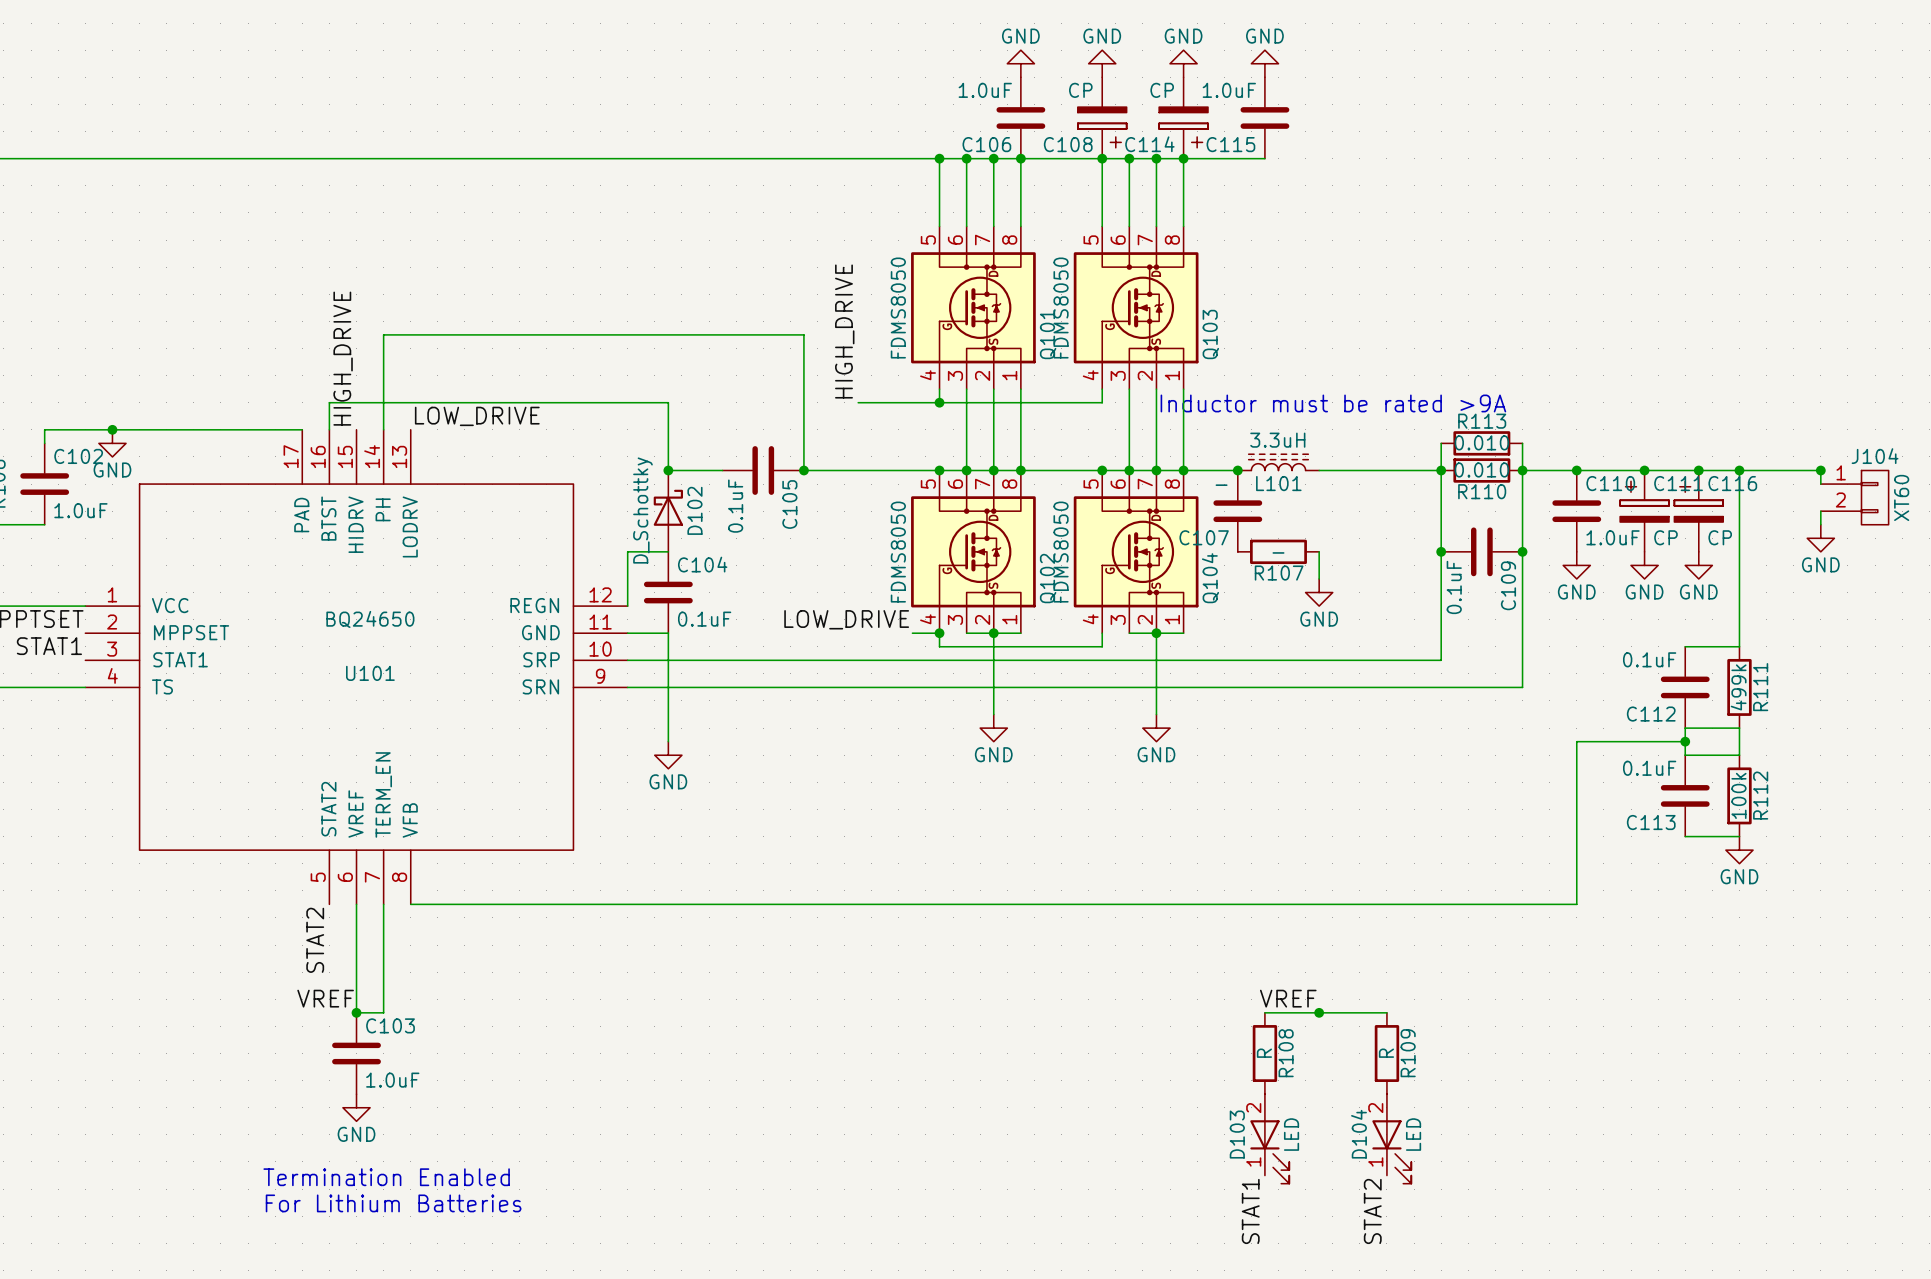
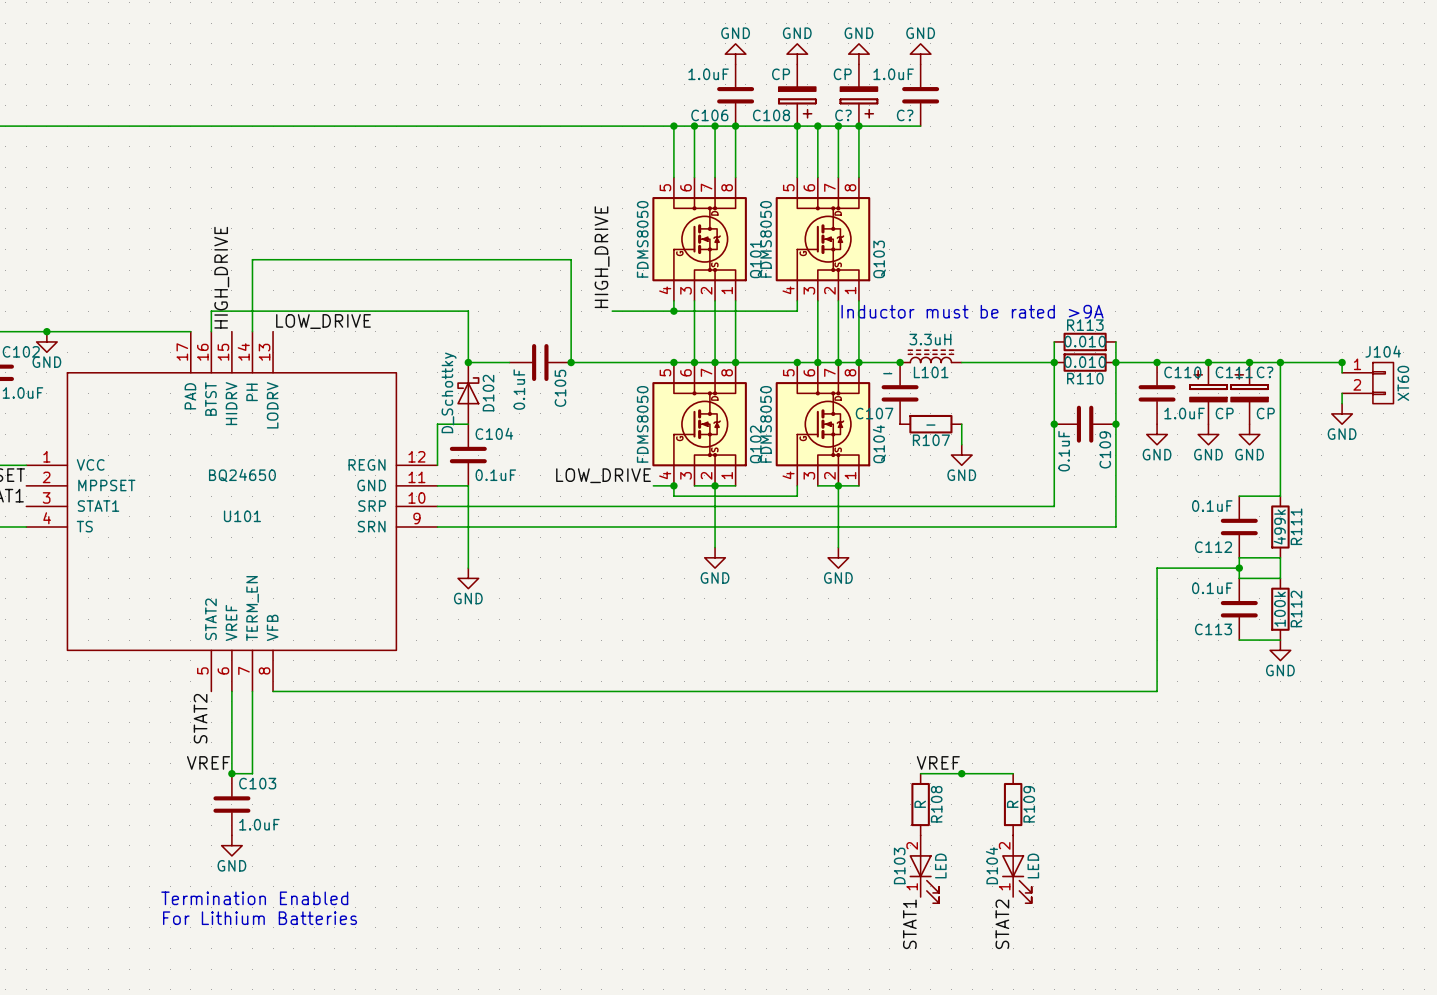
C114 name: C114 (1149, 144) -> C? (843, 115)
C115 name: C115 (1230, 144) -> C? (905, 115)
C116 name: C116 (1732, 483) -> C? (1265, 372)

